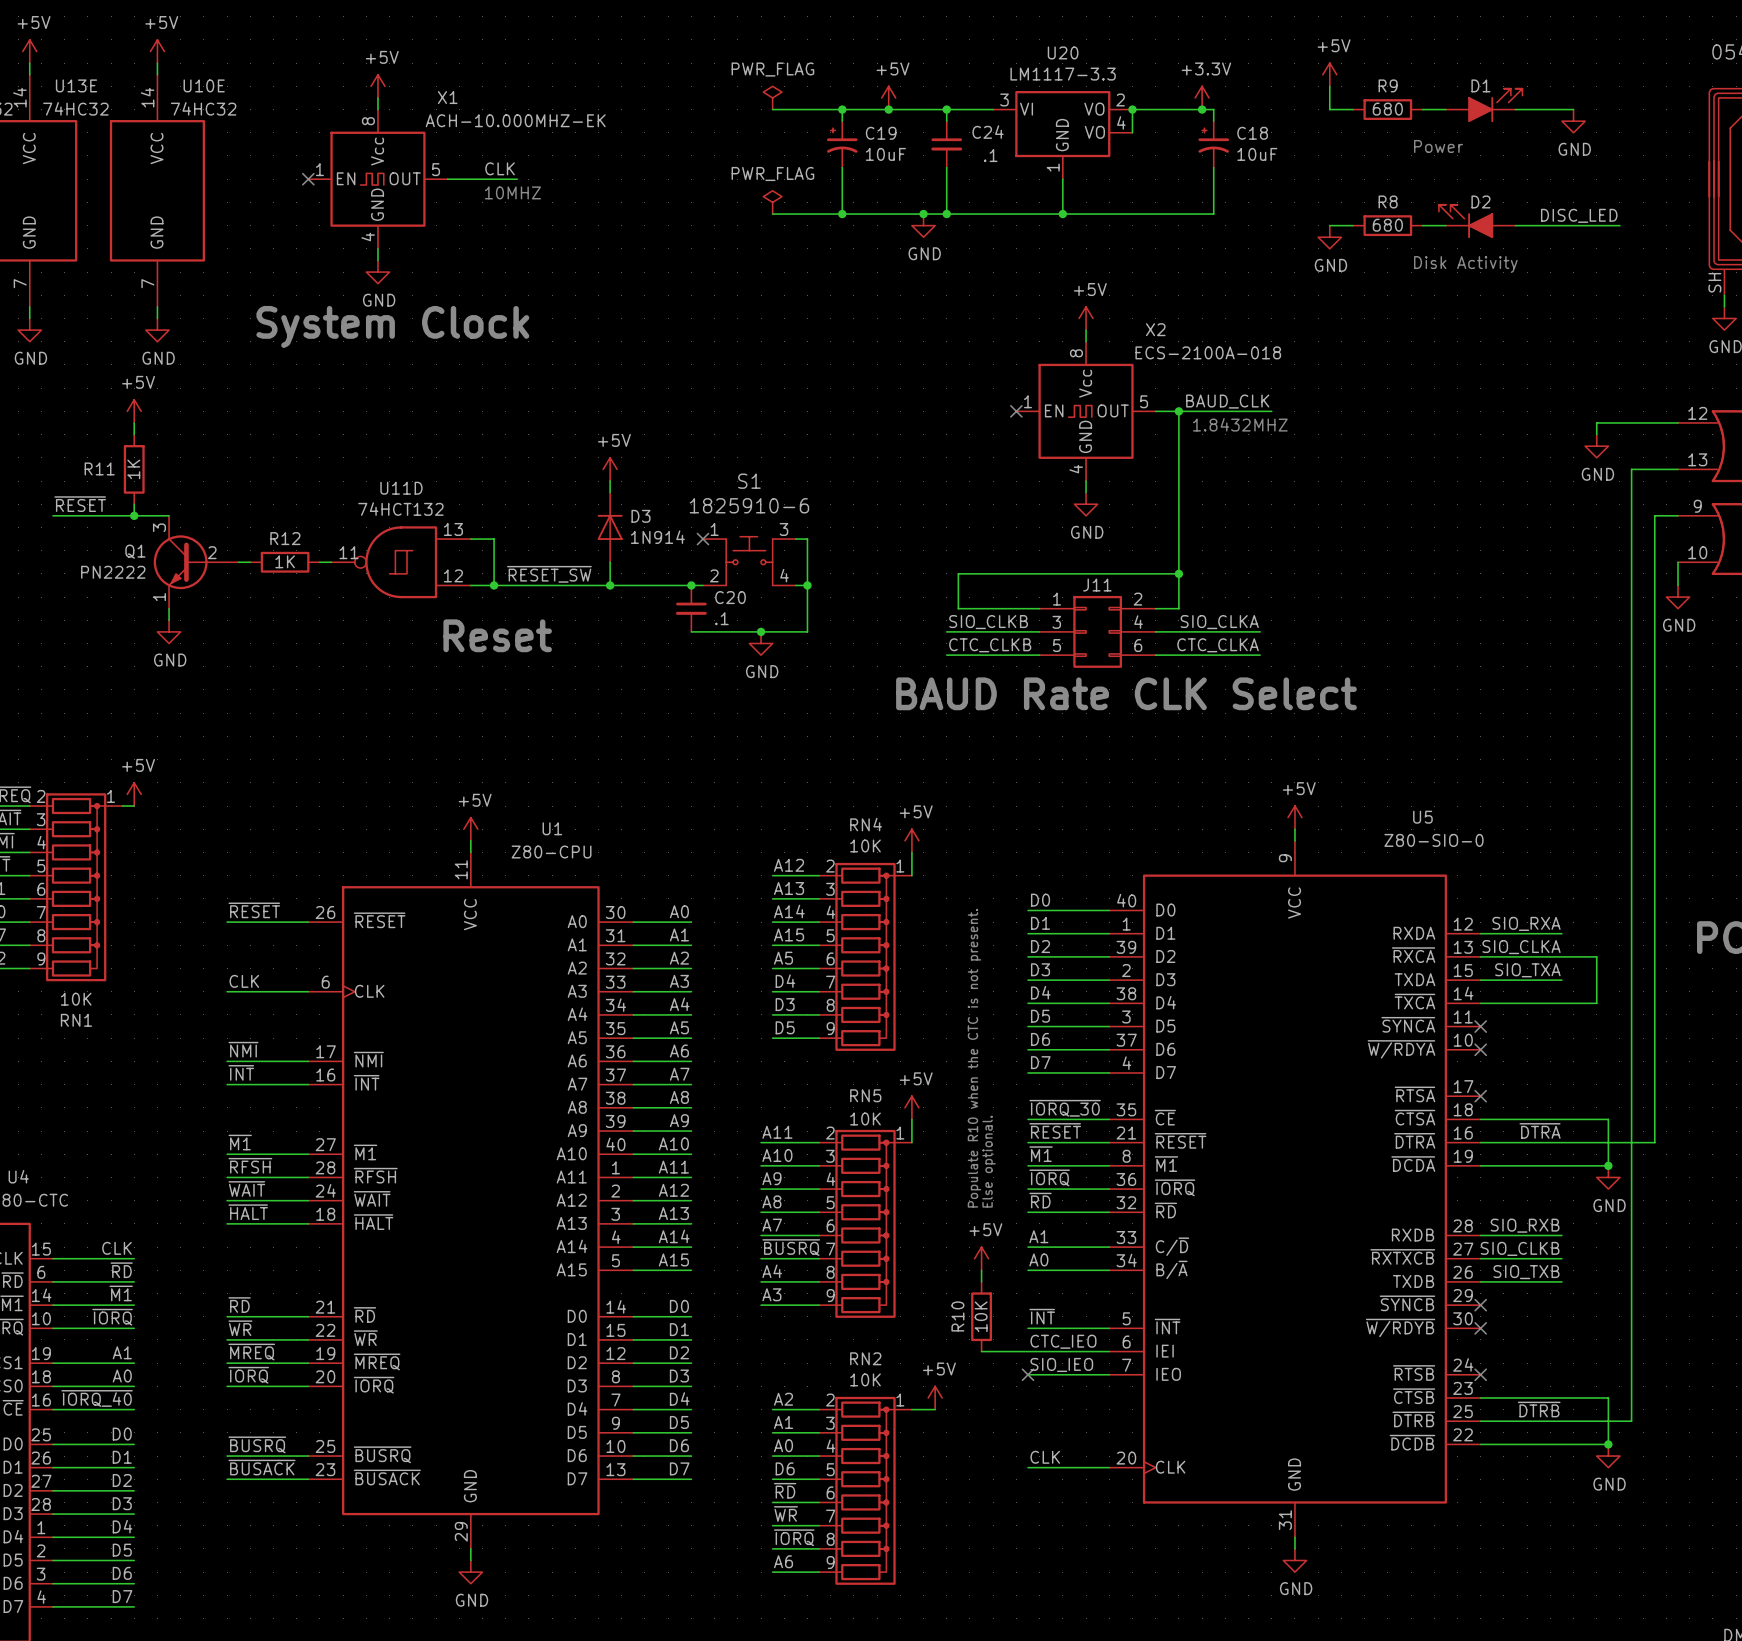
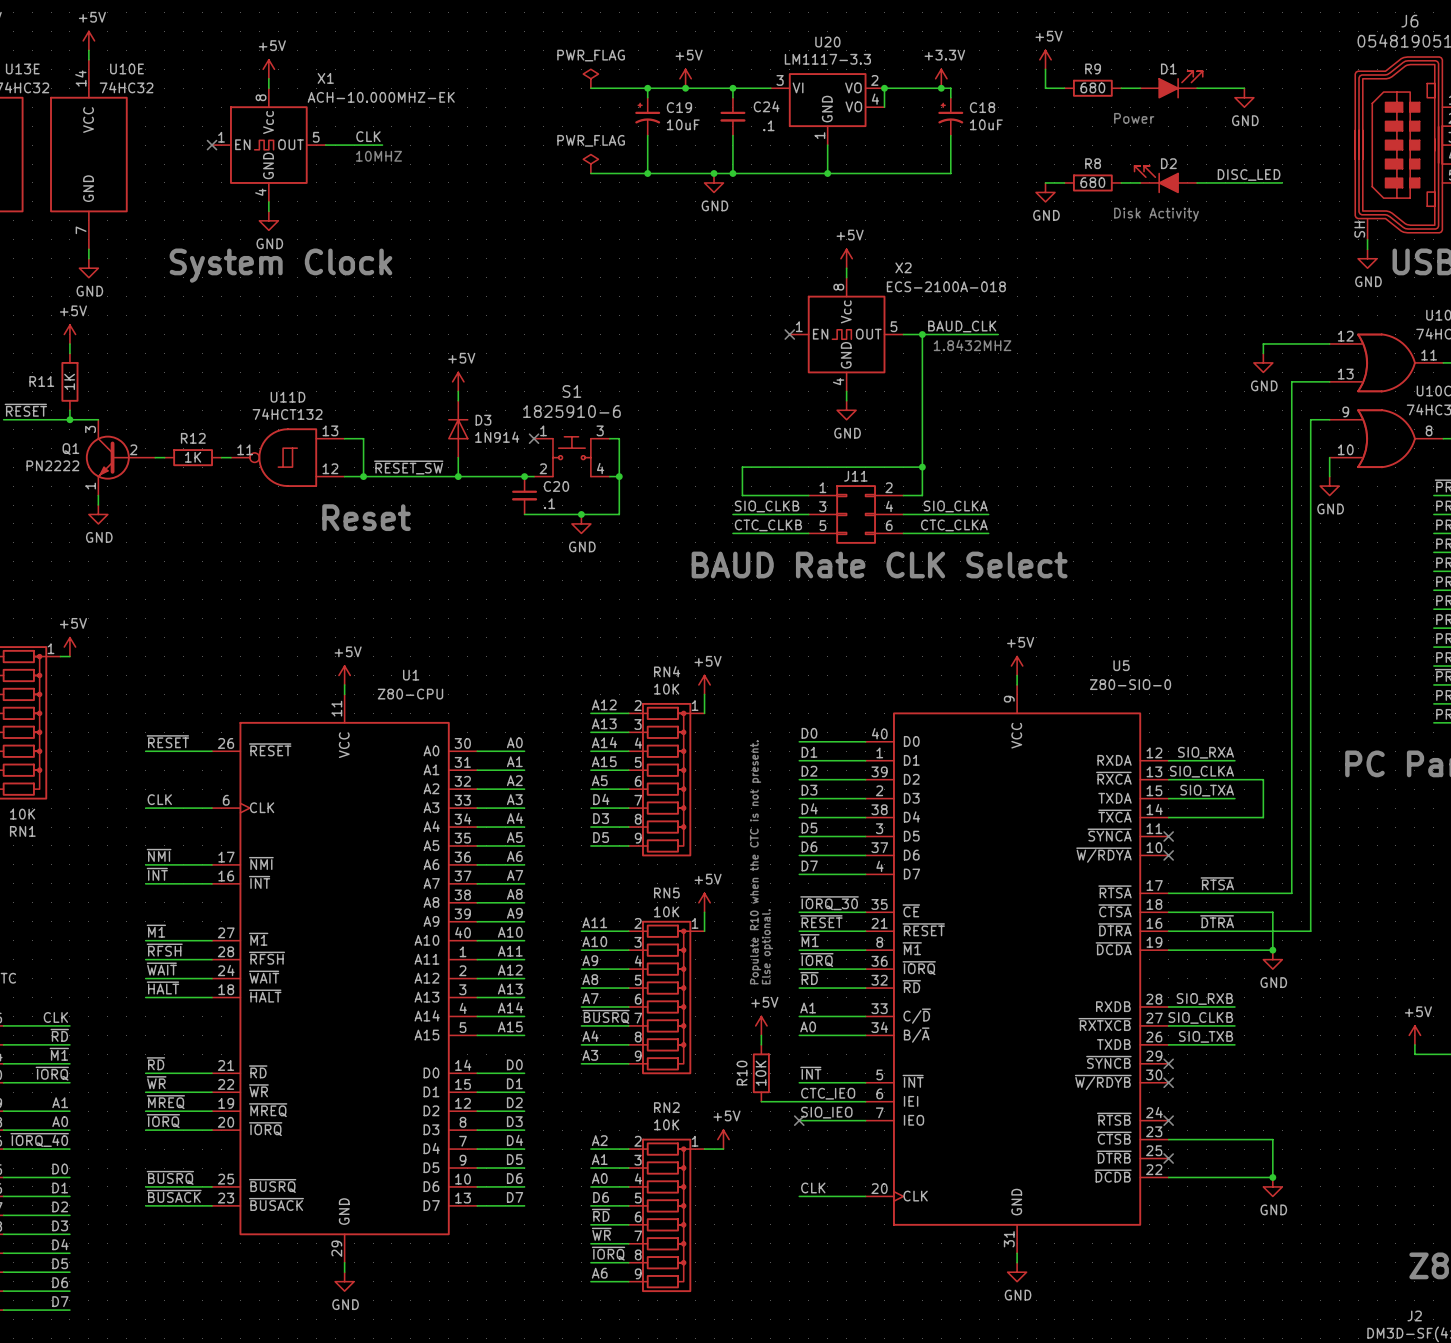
label: none -> ~{RTSA} (1217, 883)
no-connect mark: (1480, 1096) -> none
wire: (1631, 1096) (1631, 1421) (1480, 1421) -> (1291, 893) (1168, 893)
label: ~{DTRB} (1539, 1409) -> none
no-connect mark: none -> (1168, 1158)

